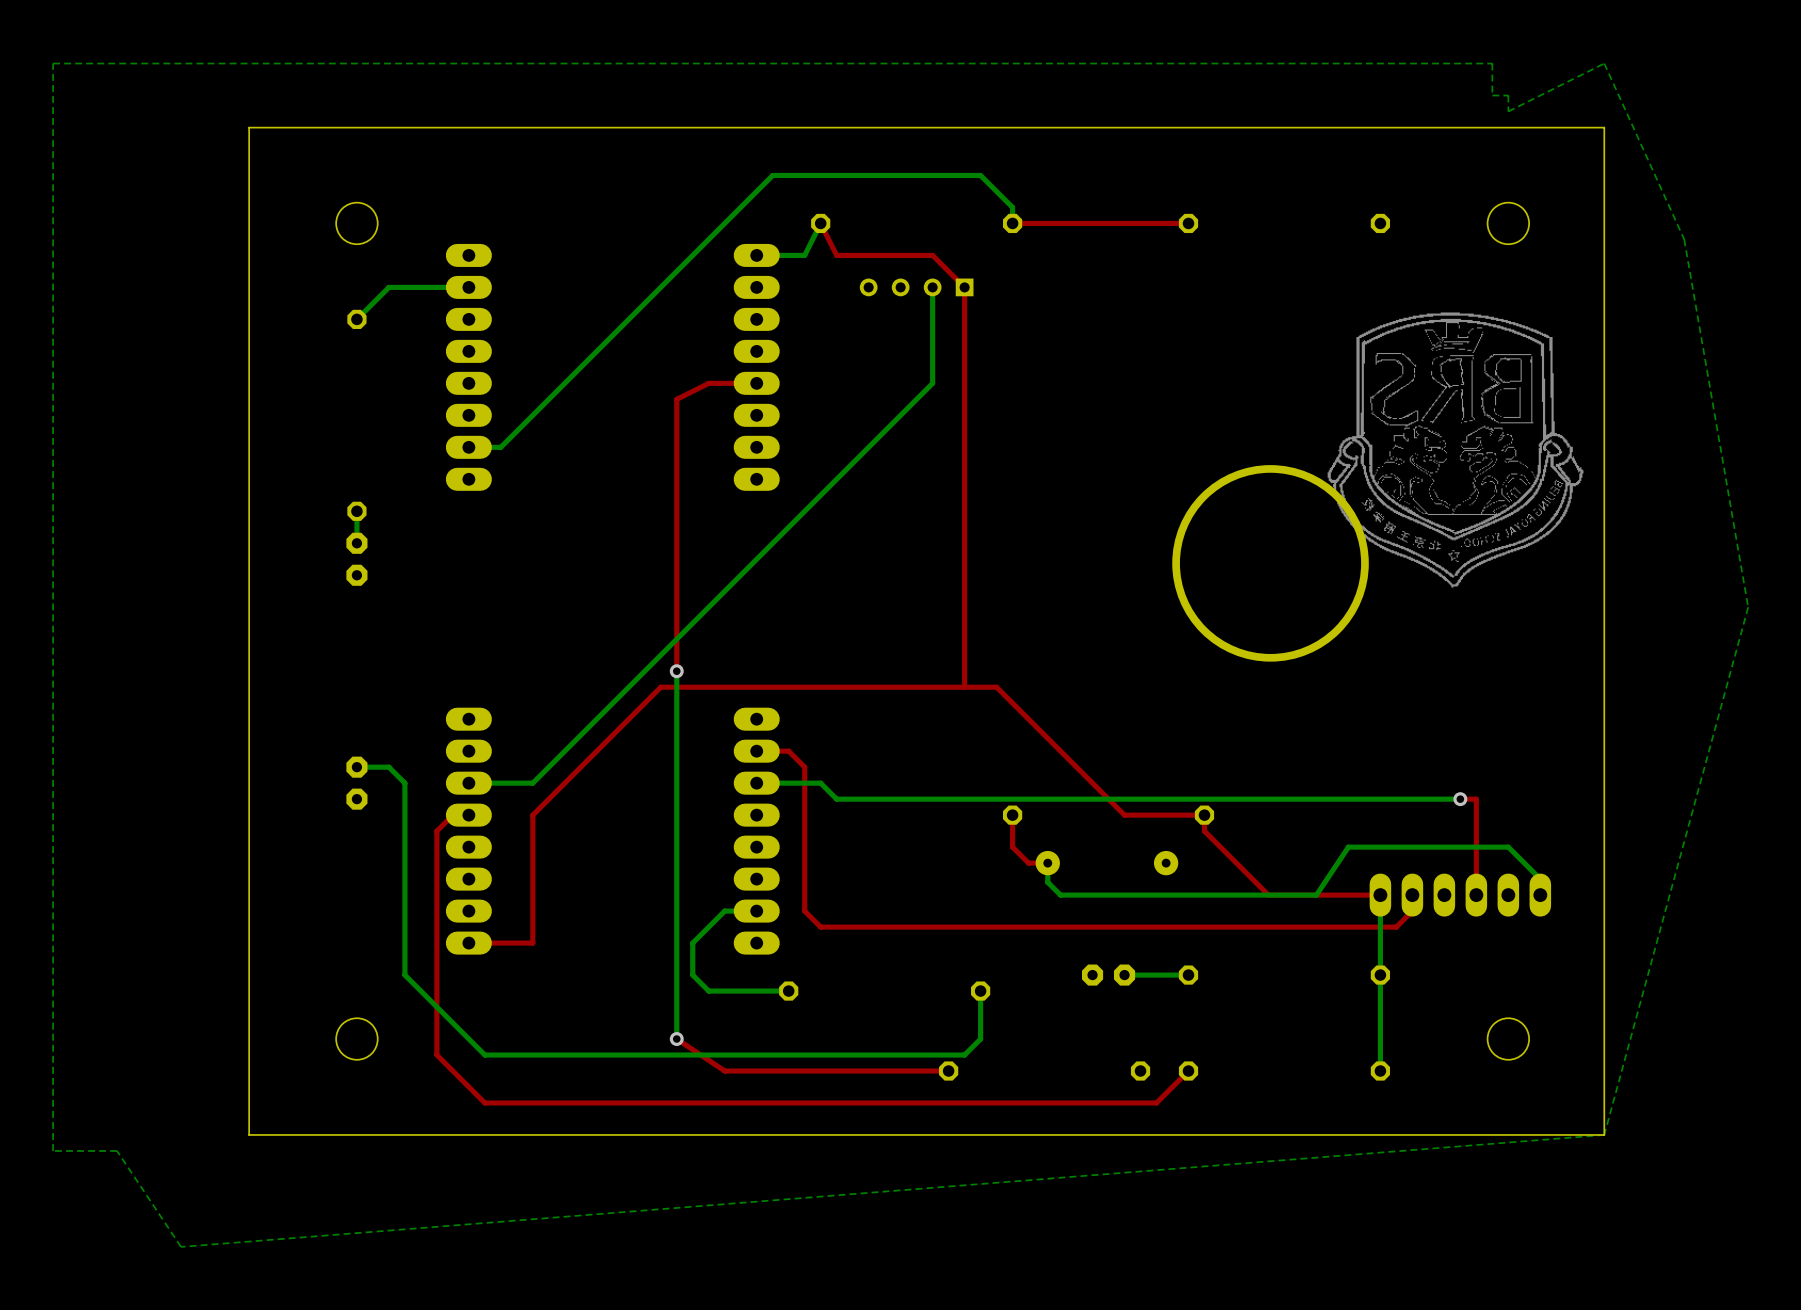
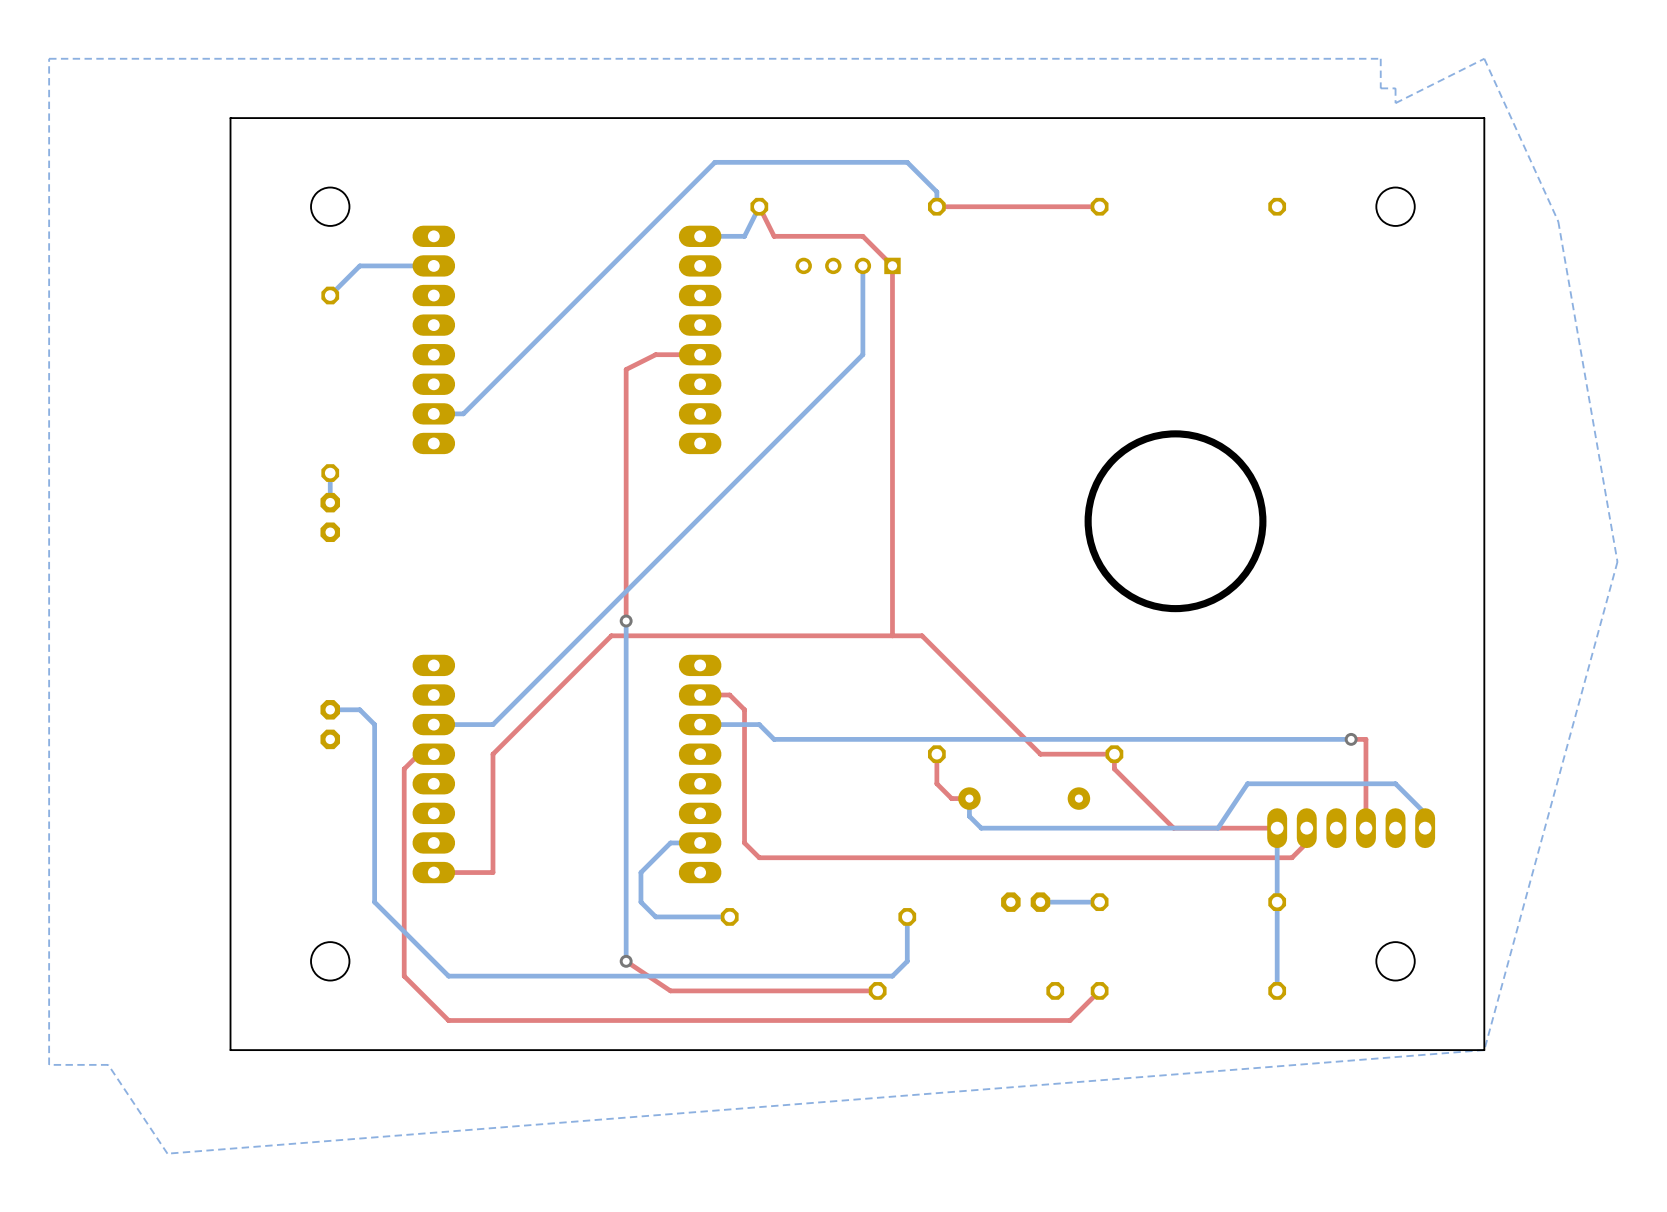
drawing: [1327, 312, 1584, 588] -> none

